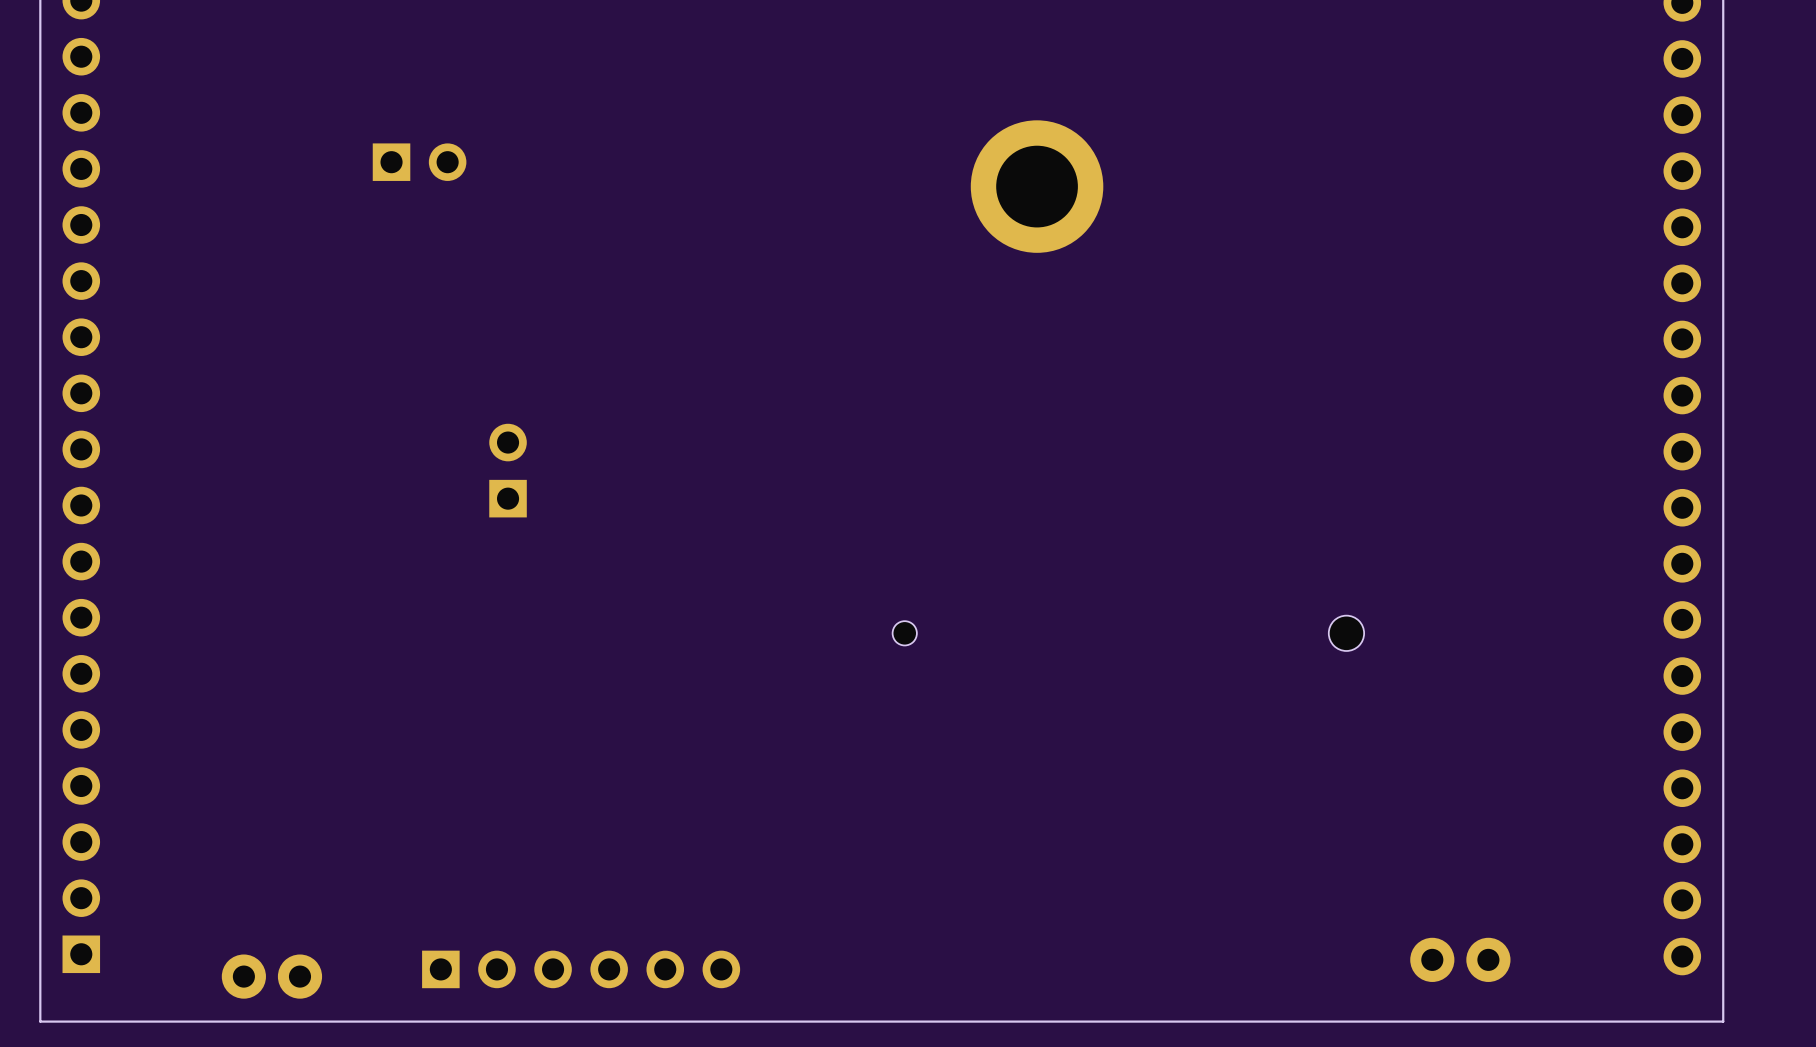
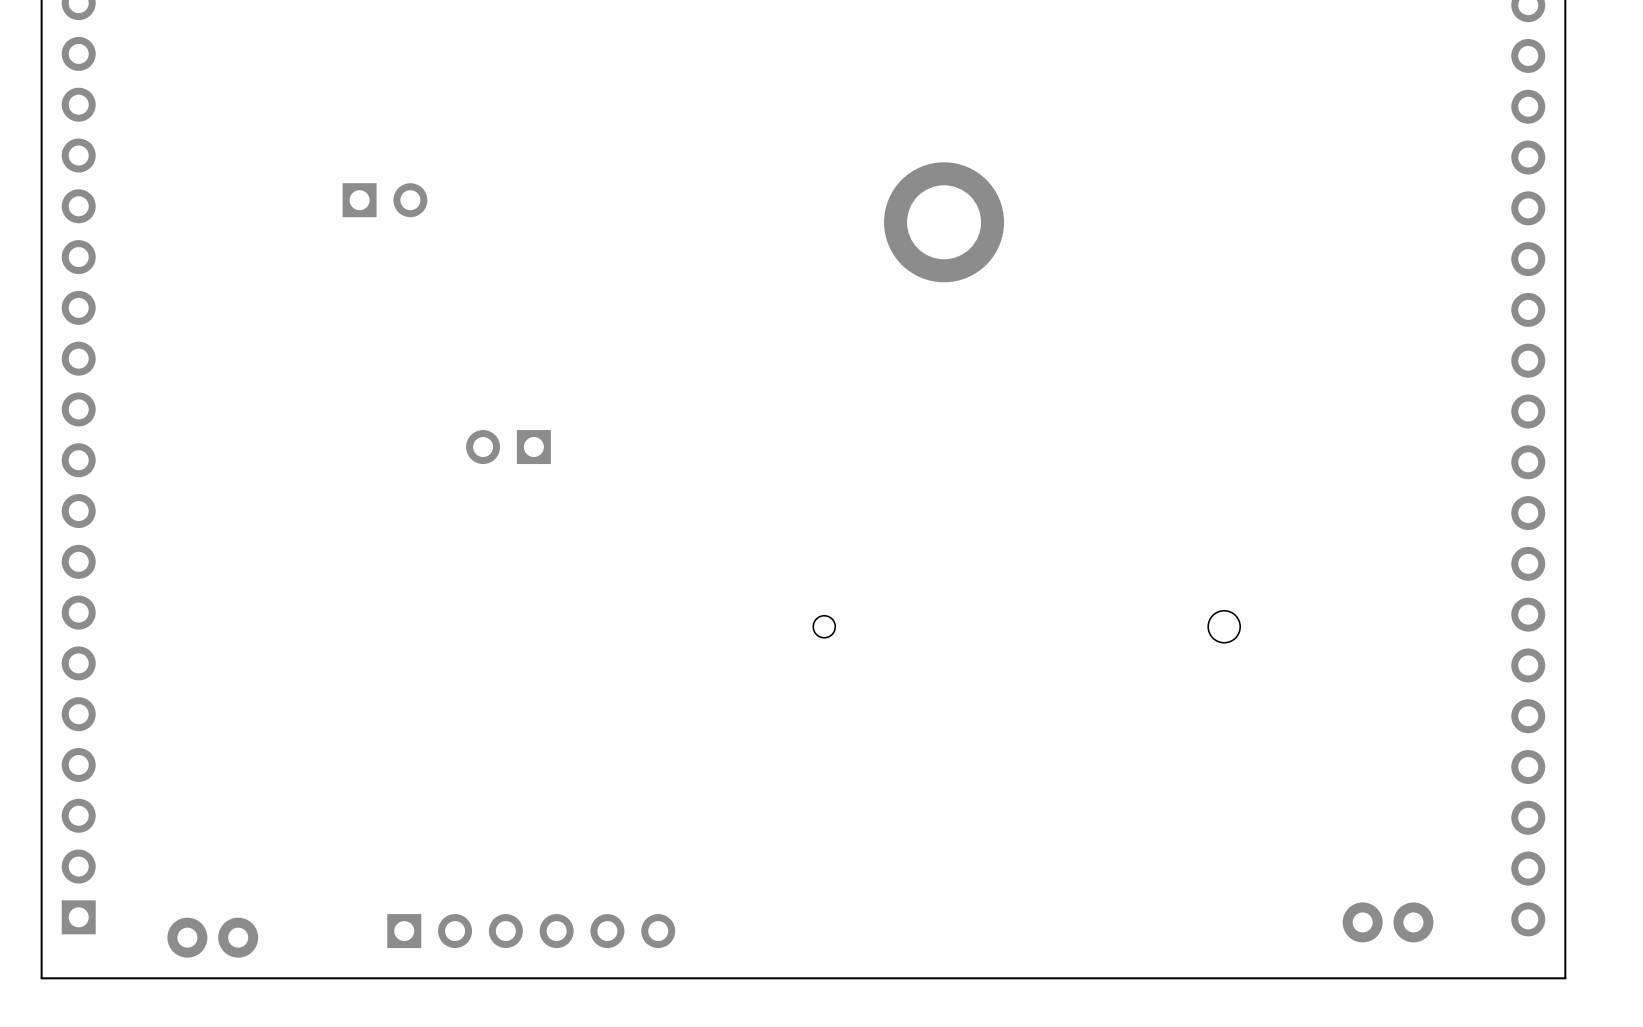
part rotation: 0° (508, 470) -> 90° counterclockwise (508, 447)
part position: (508, 470) -> (508, 447)
part position: (1460, 959) -> (1388, 922)
part position: (271, 976) -> (212, 937)

